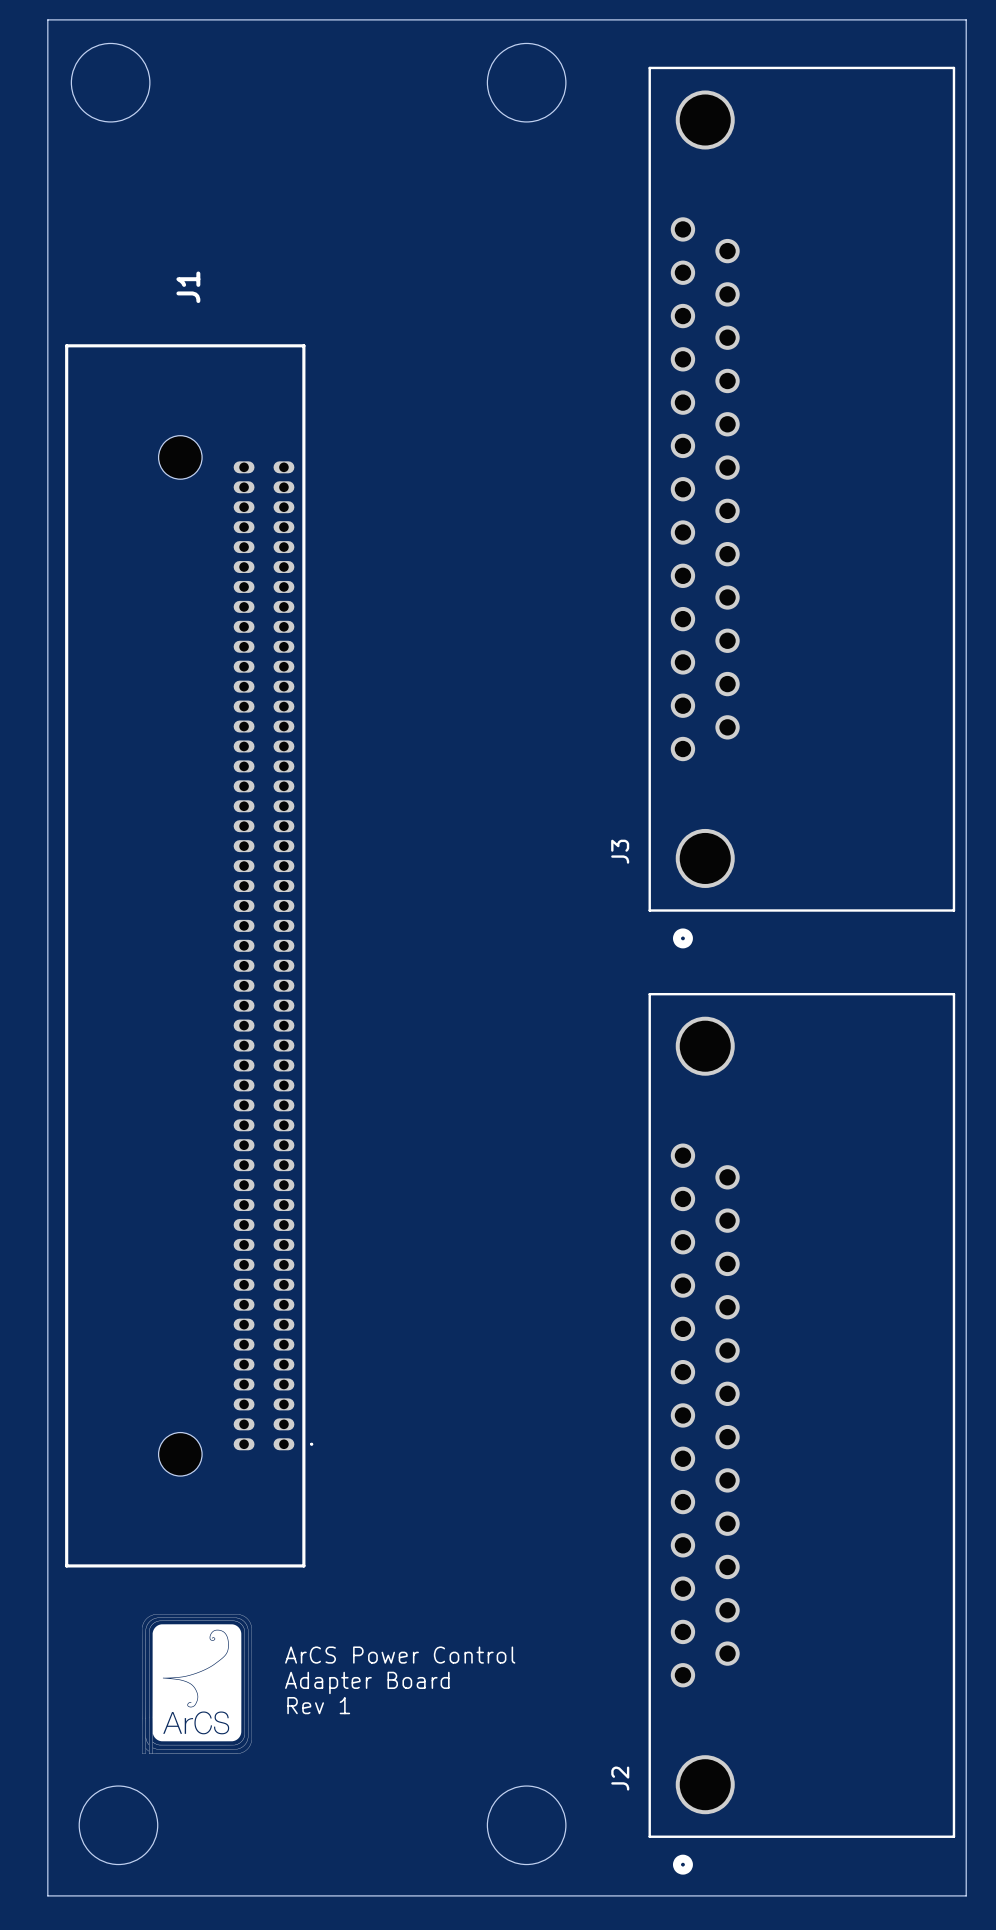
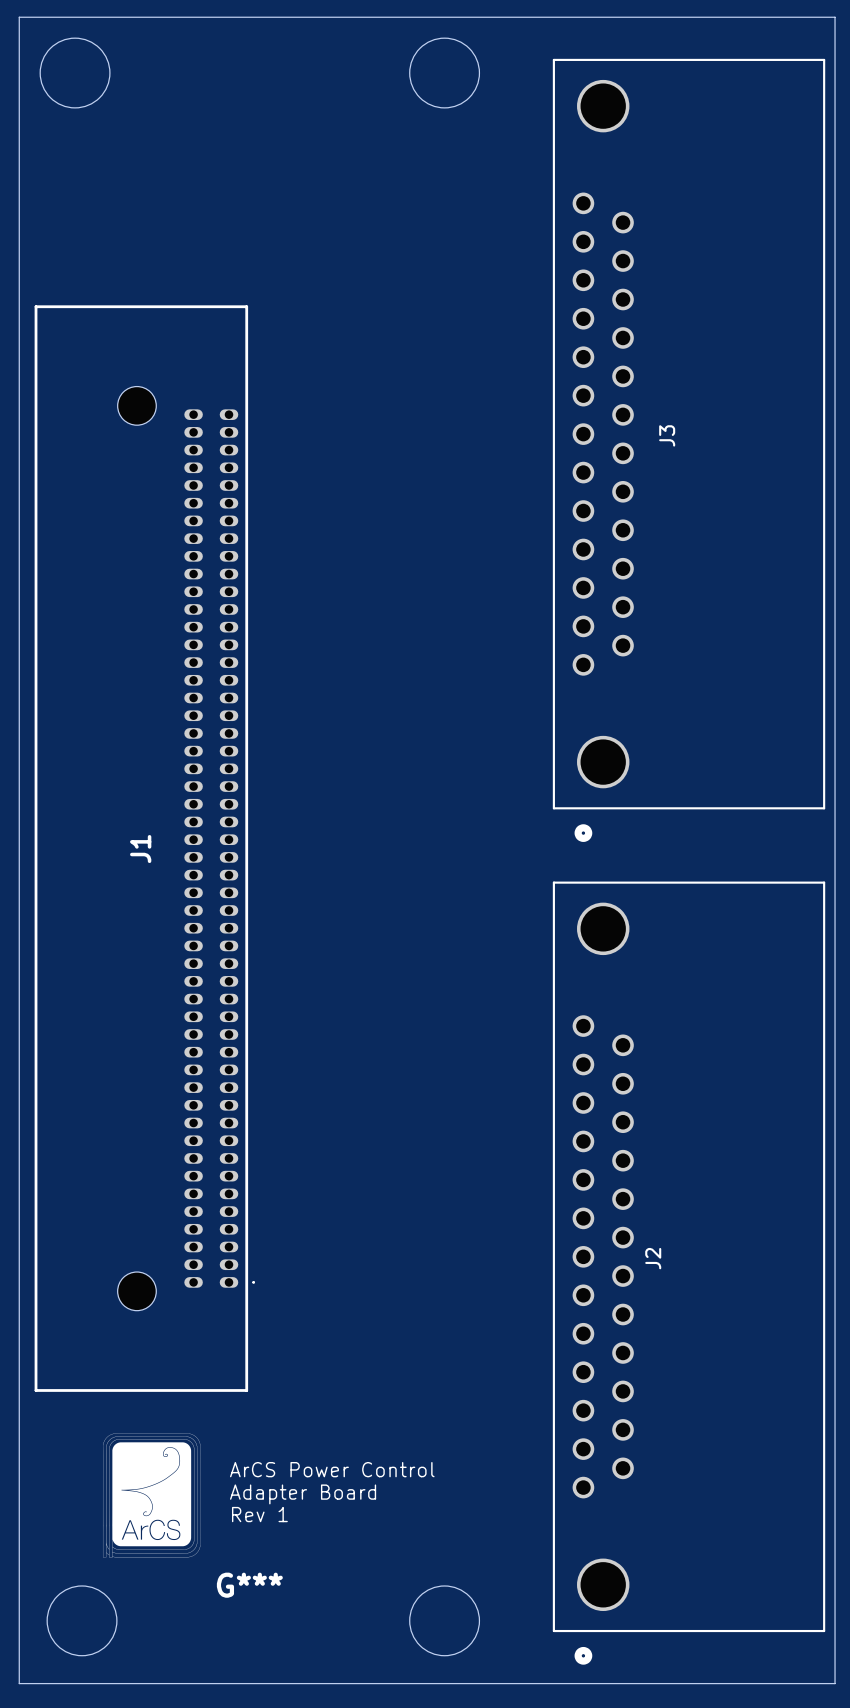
J1 name position: J1 (188, 287) -> J1 (140, 849)
J3 name position: J3 (620, 851) -> J3 (667, 435)
G***: none -> (151, 1495)
J2 name position: J2 (620, 1778) -> J2 (653, 1258)

